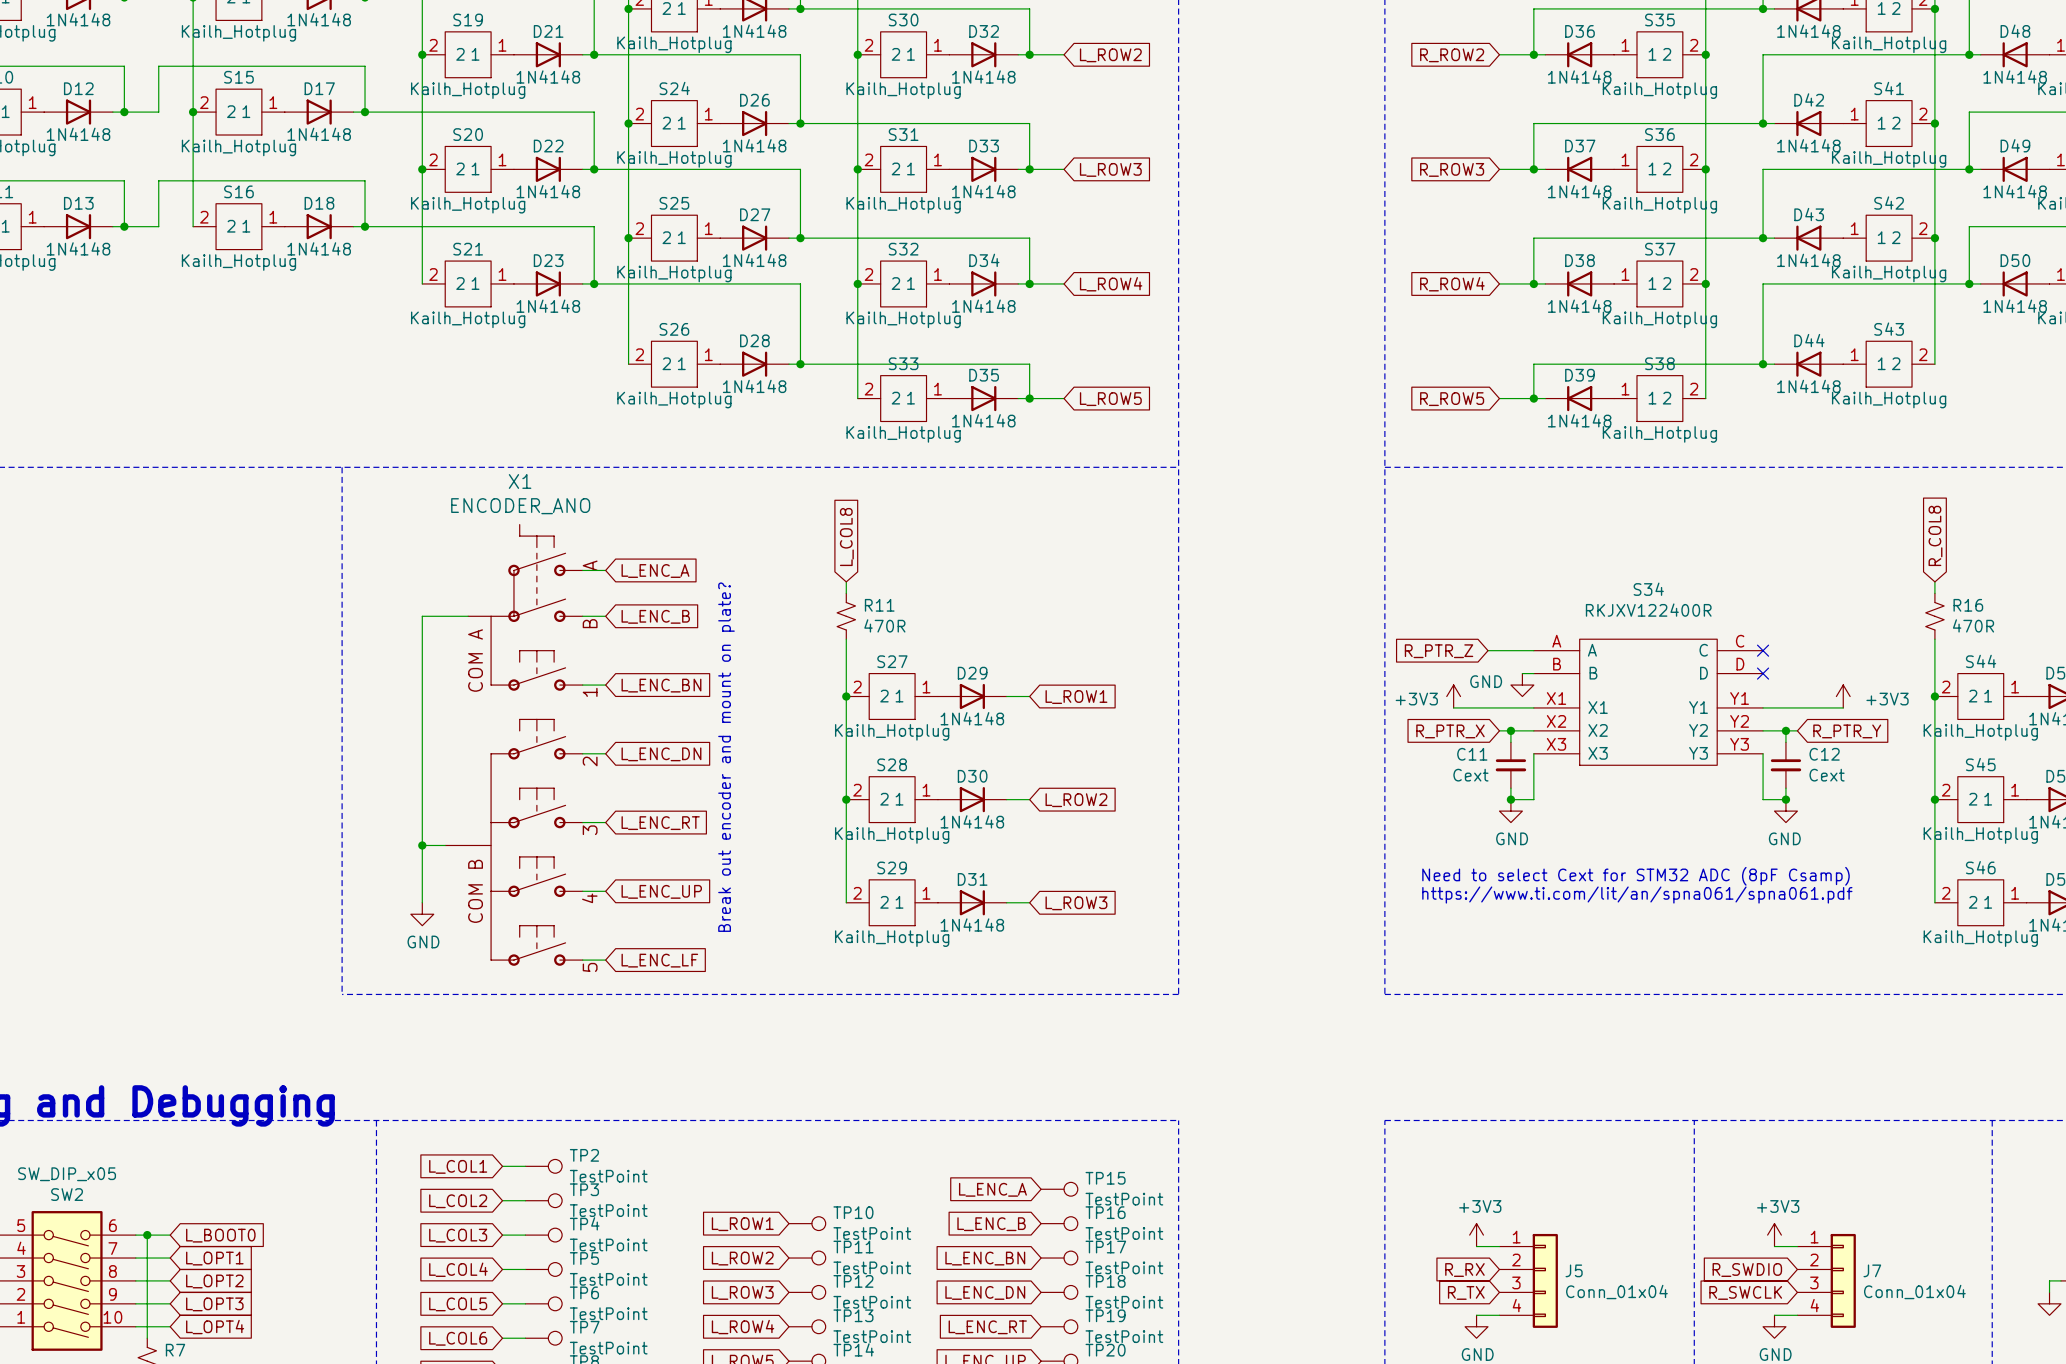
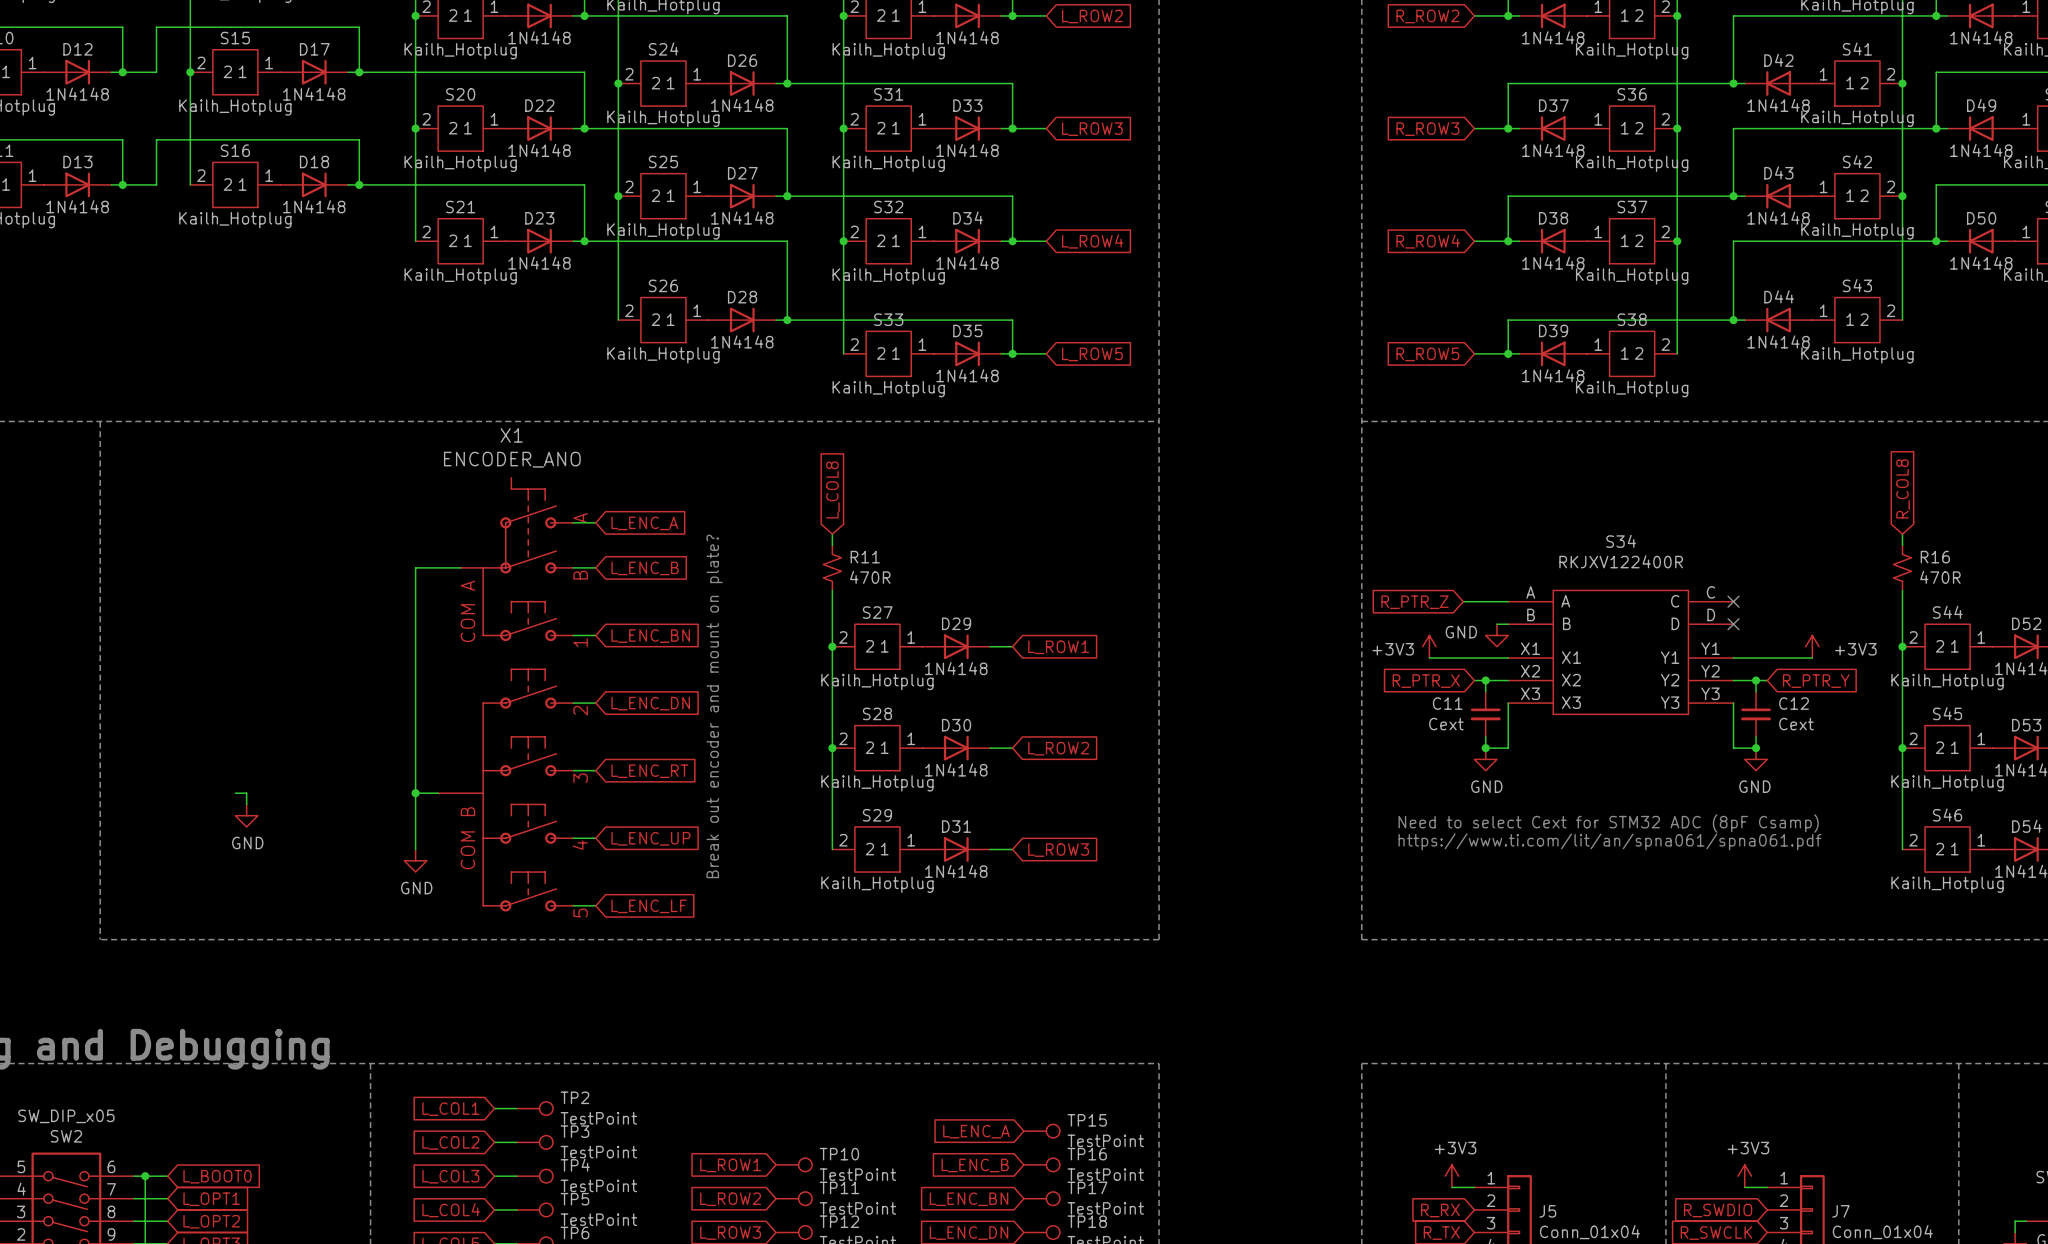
line: (342, 467) (342, 994) -> (100, 421) (100, 939) (336, 939)
wire: none -> (235, 793) (246, 793) (246, 804)
power symbol: none -> GND (246, 815)

